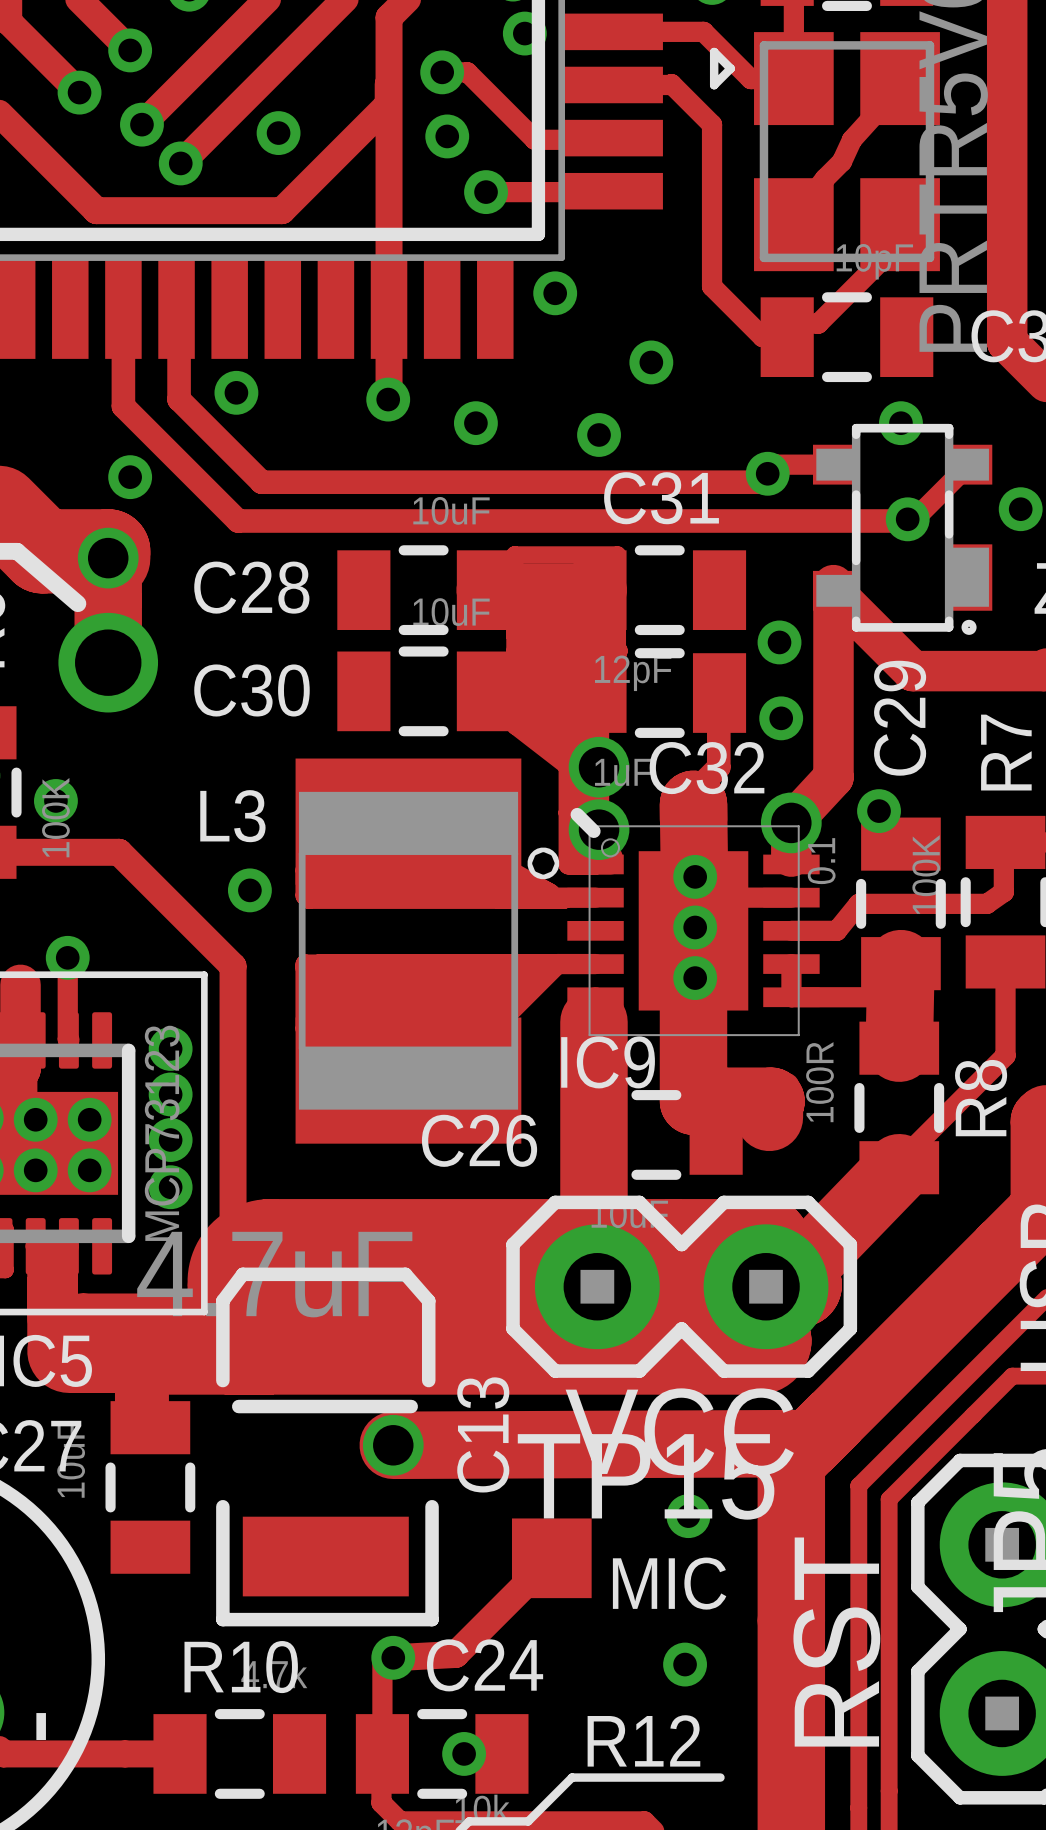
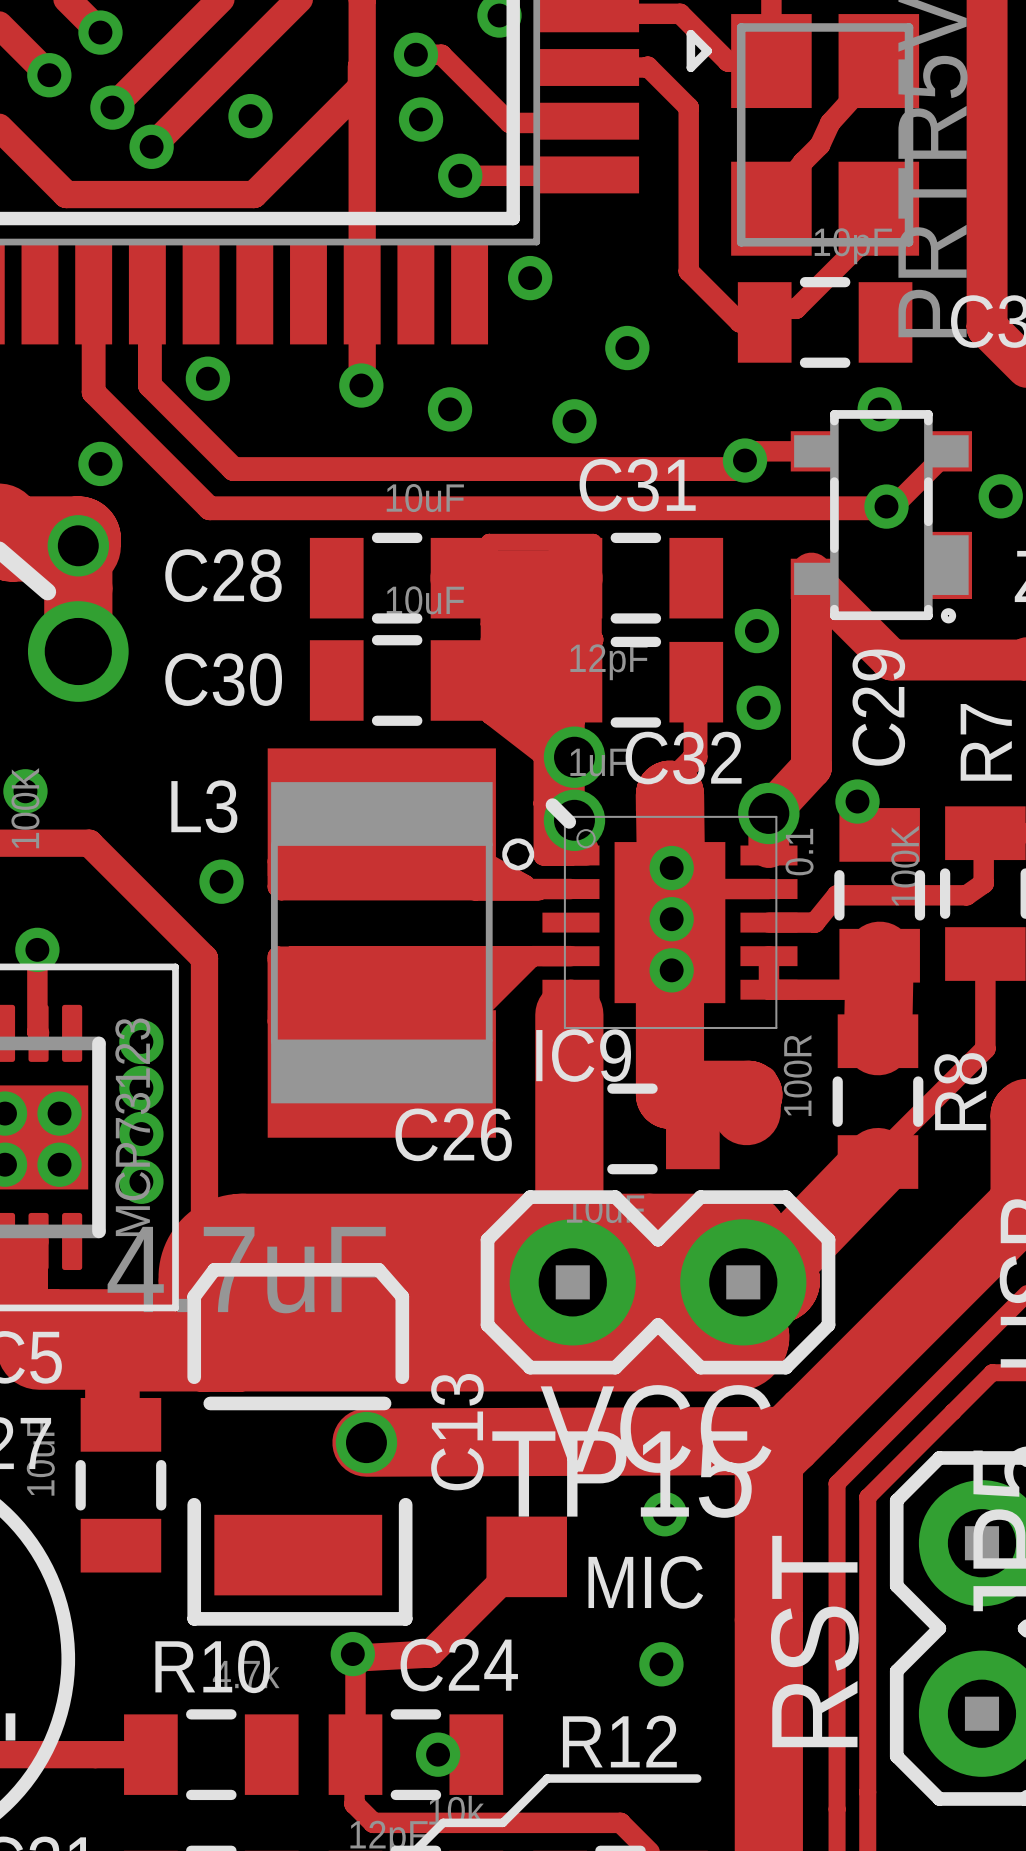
via position: (393, 1657) -> (352, 1654)

